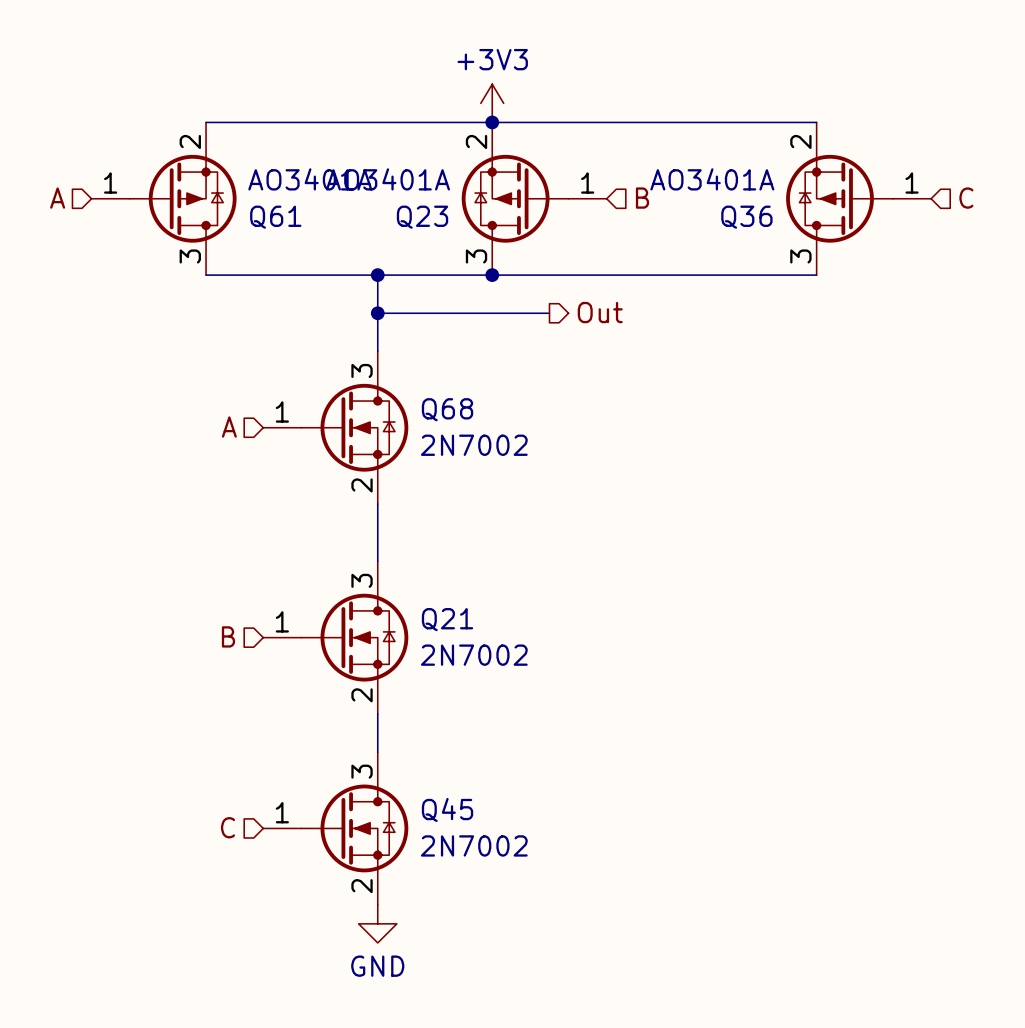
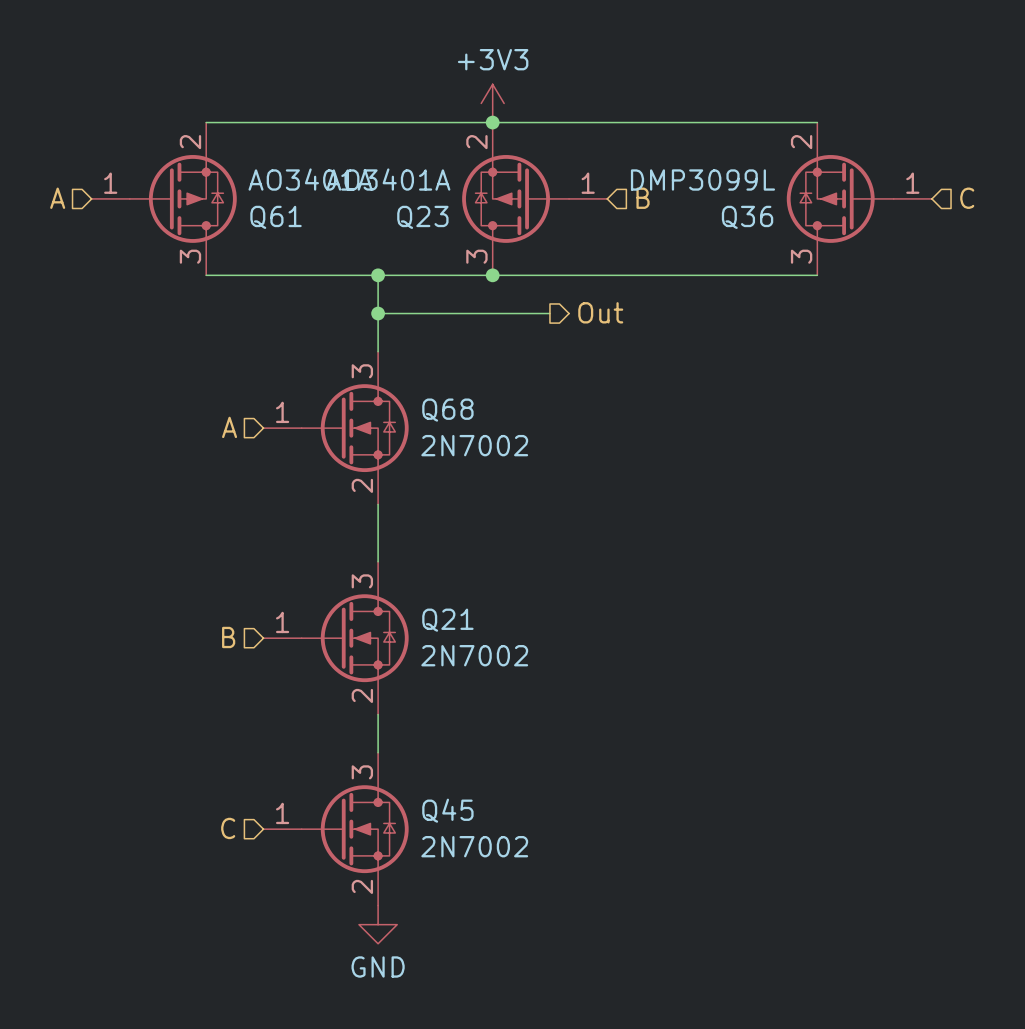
Q36 value: AO3401A (712, 179) -> DMP3099L (702, 180)

